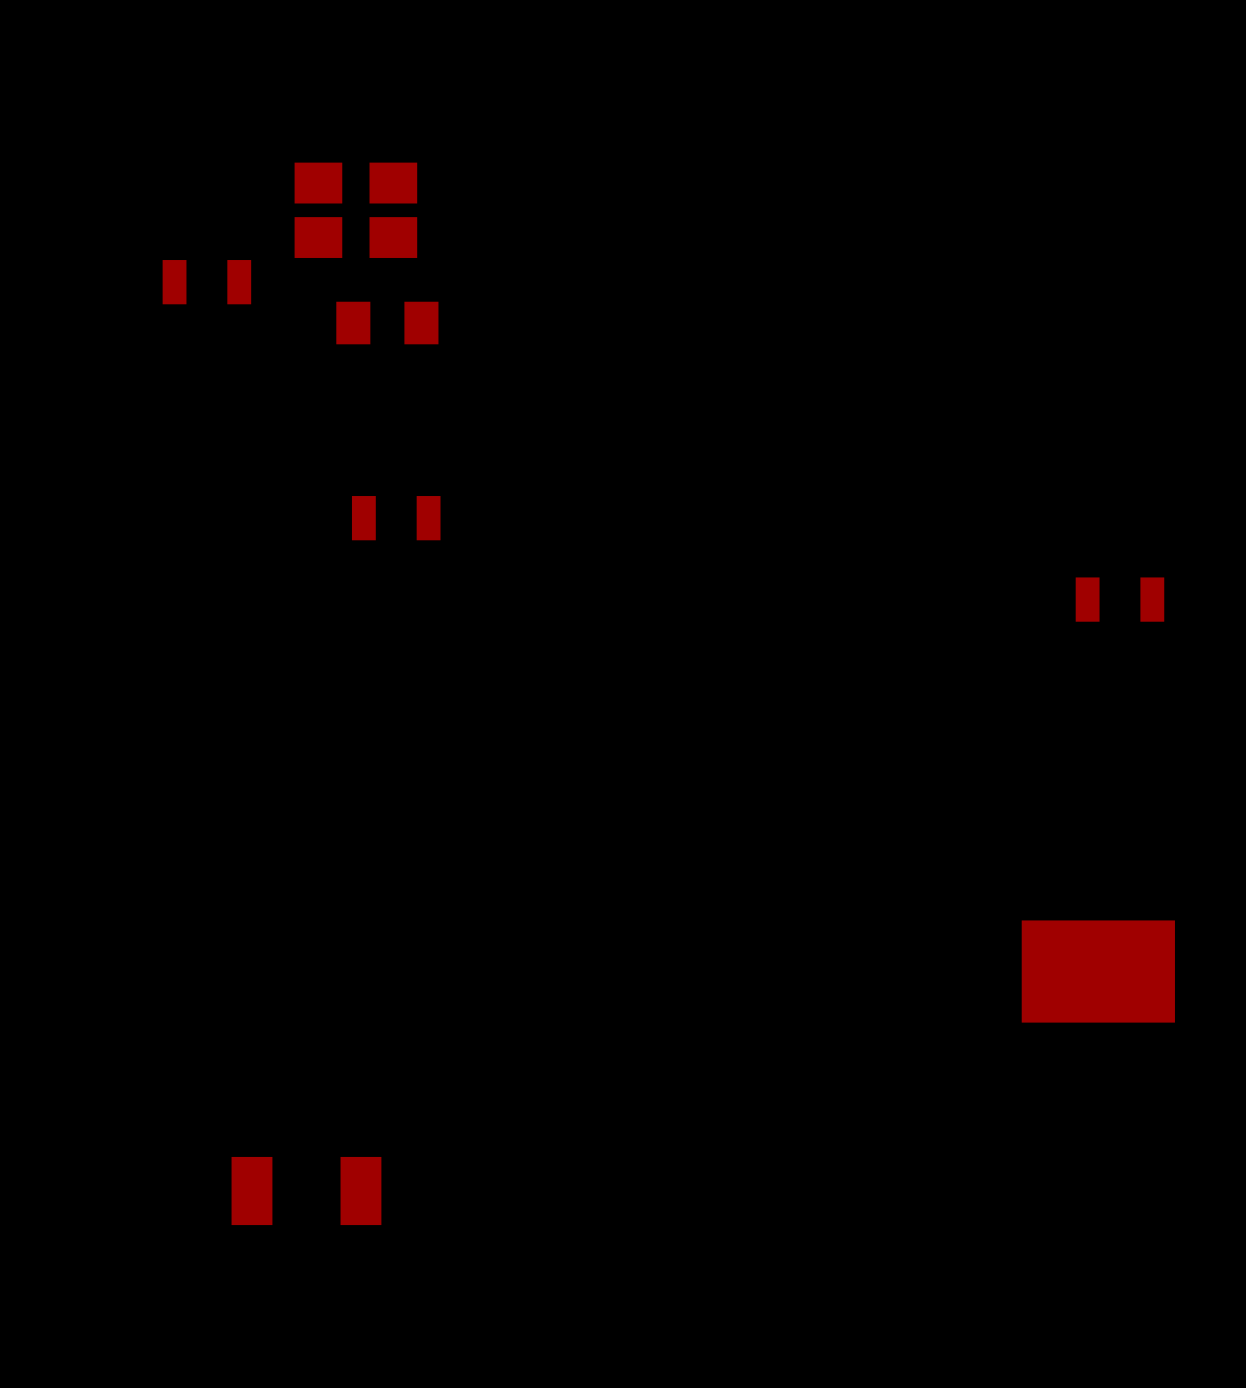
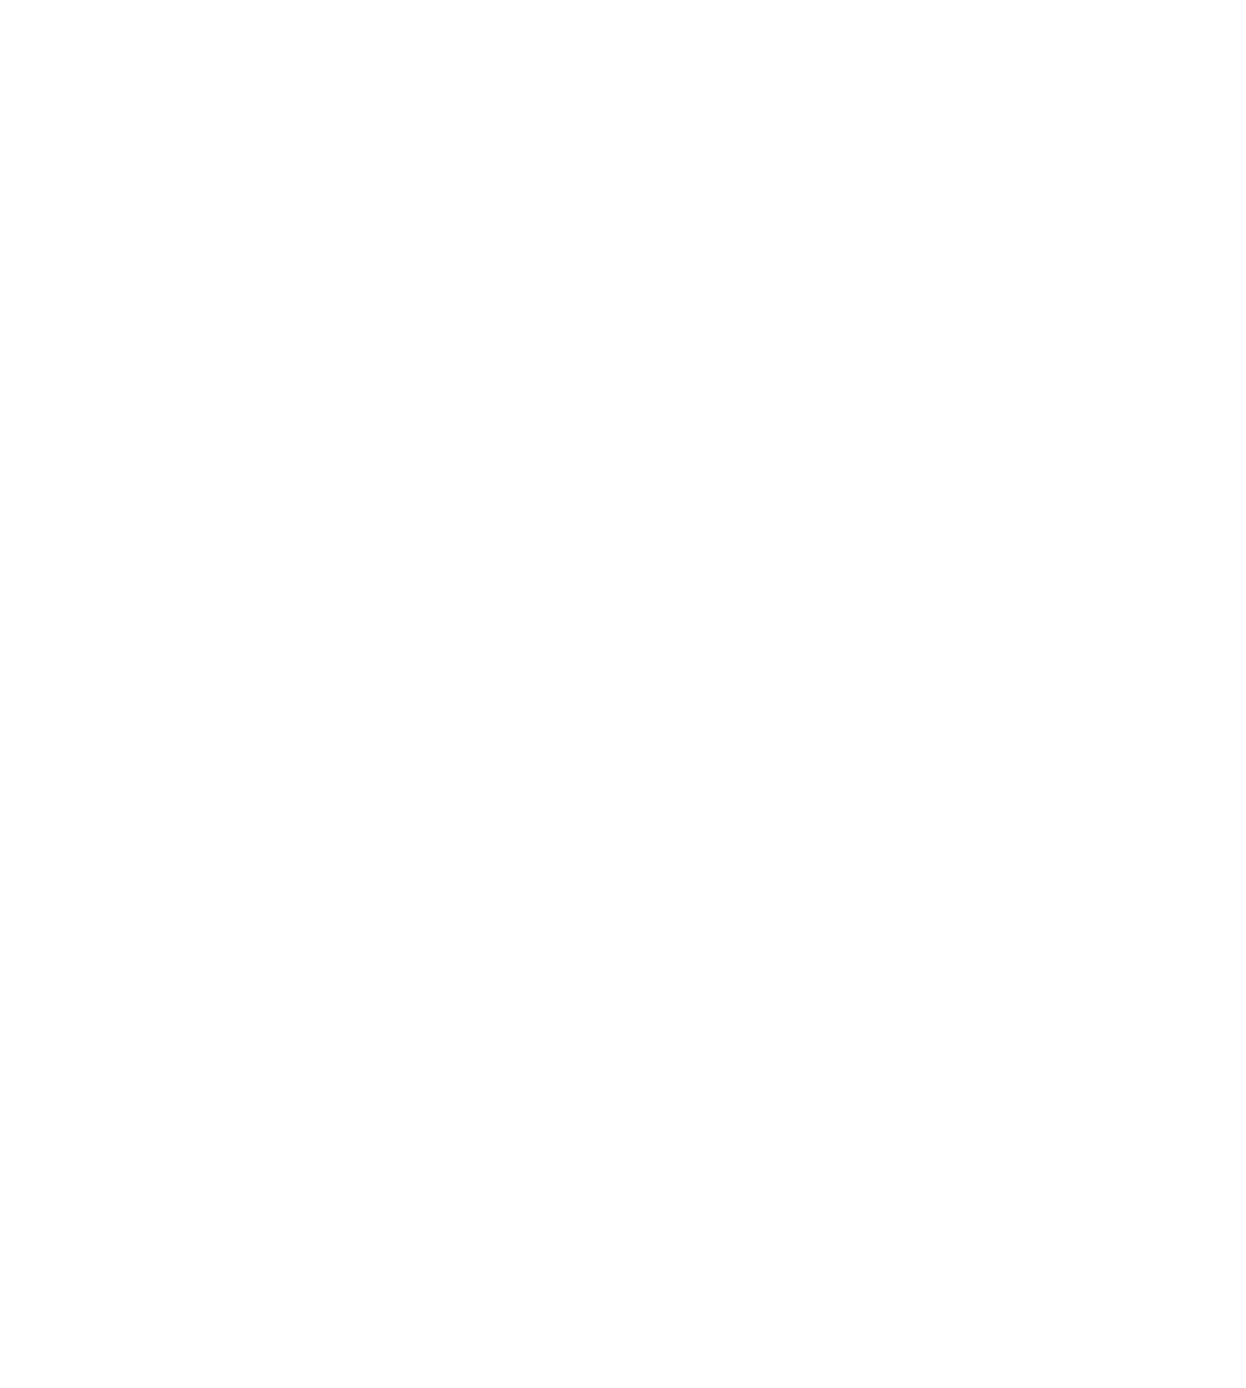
part: (355, 210) -> none
part: (206, 282) -> none
part: (387, 323) -> none
part: (396, 518) -> none
part: (1119, 599) -> none
part: (1098, 971) -> none
part: (306, 1191) -> none

